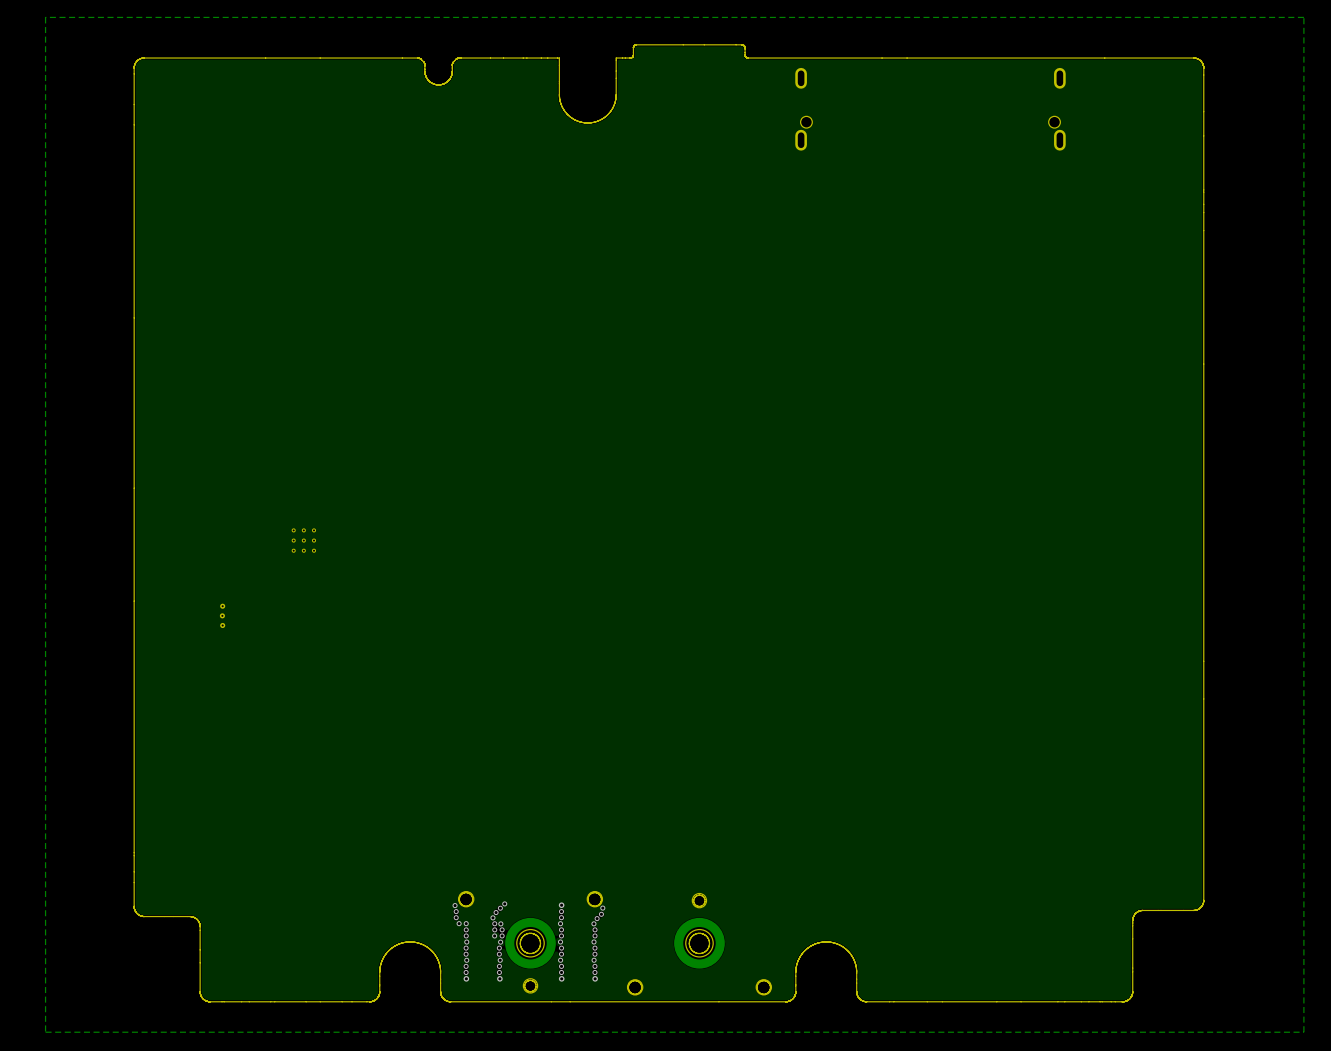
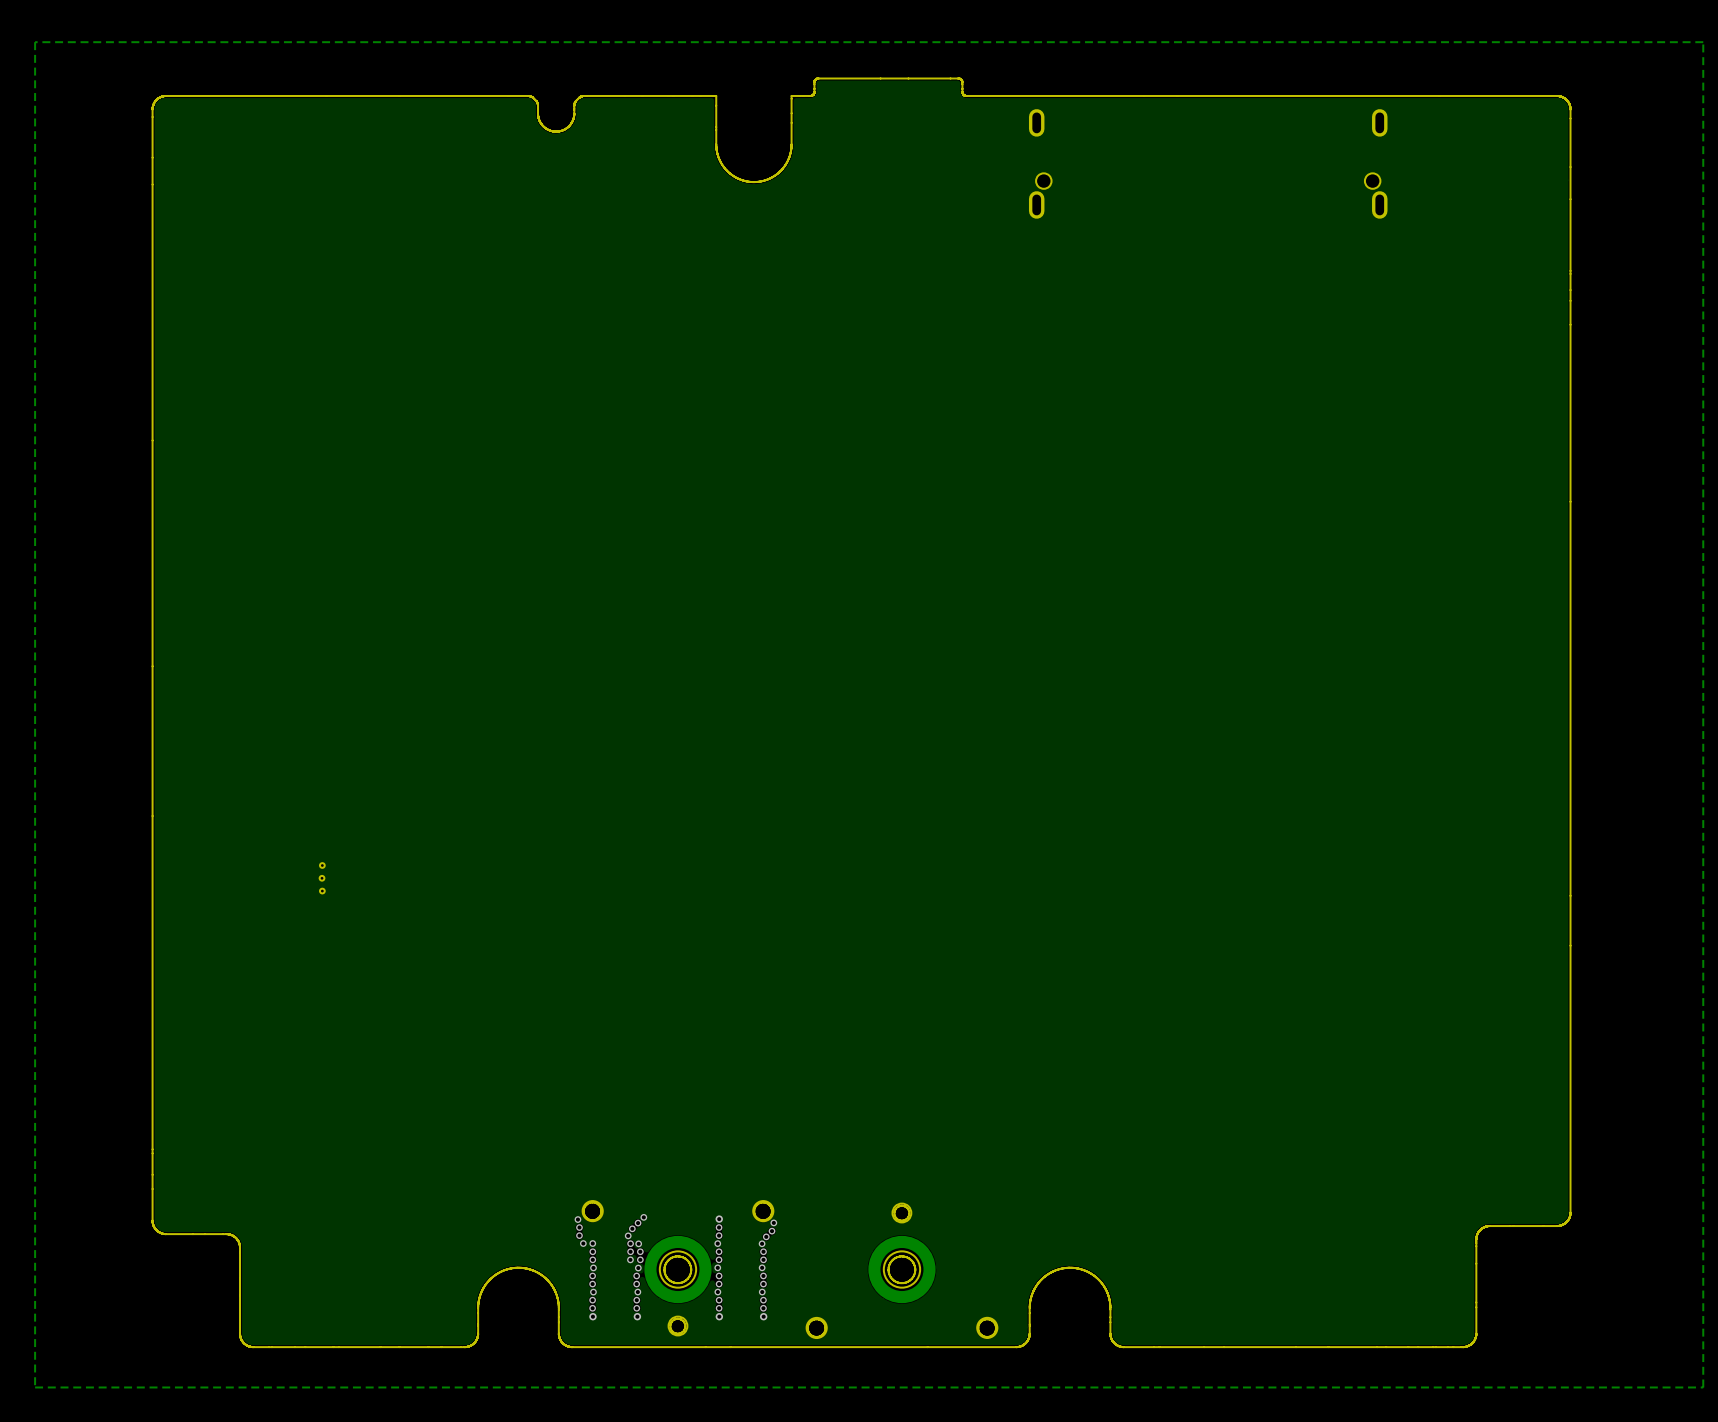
part: (303, 540) -> none
part position: (222, 615) -> (322, 878)

